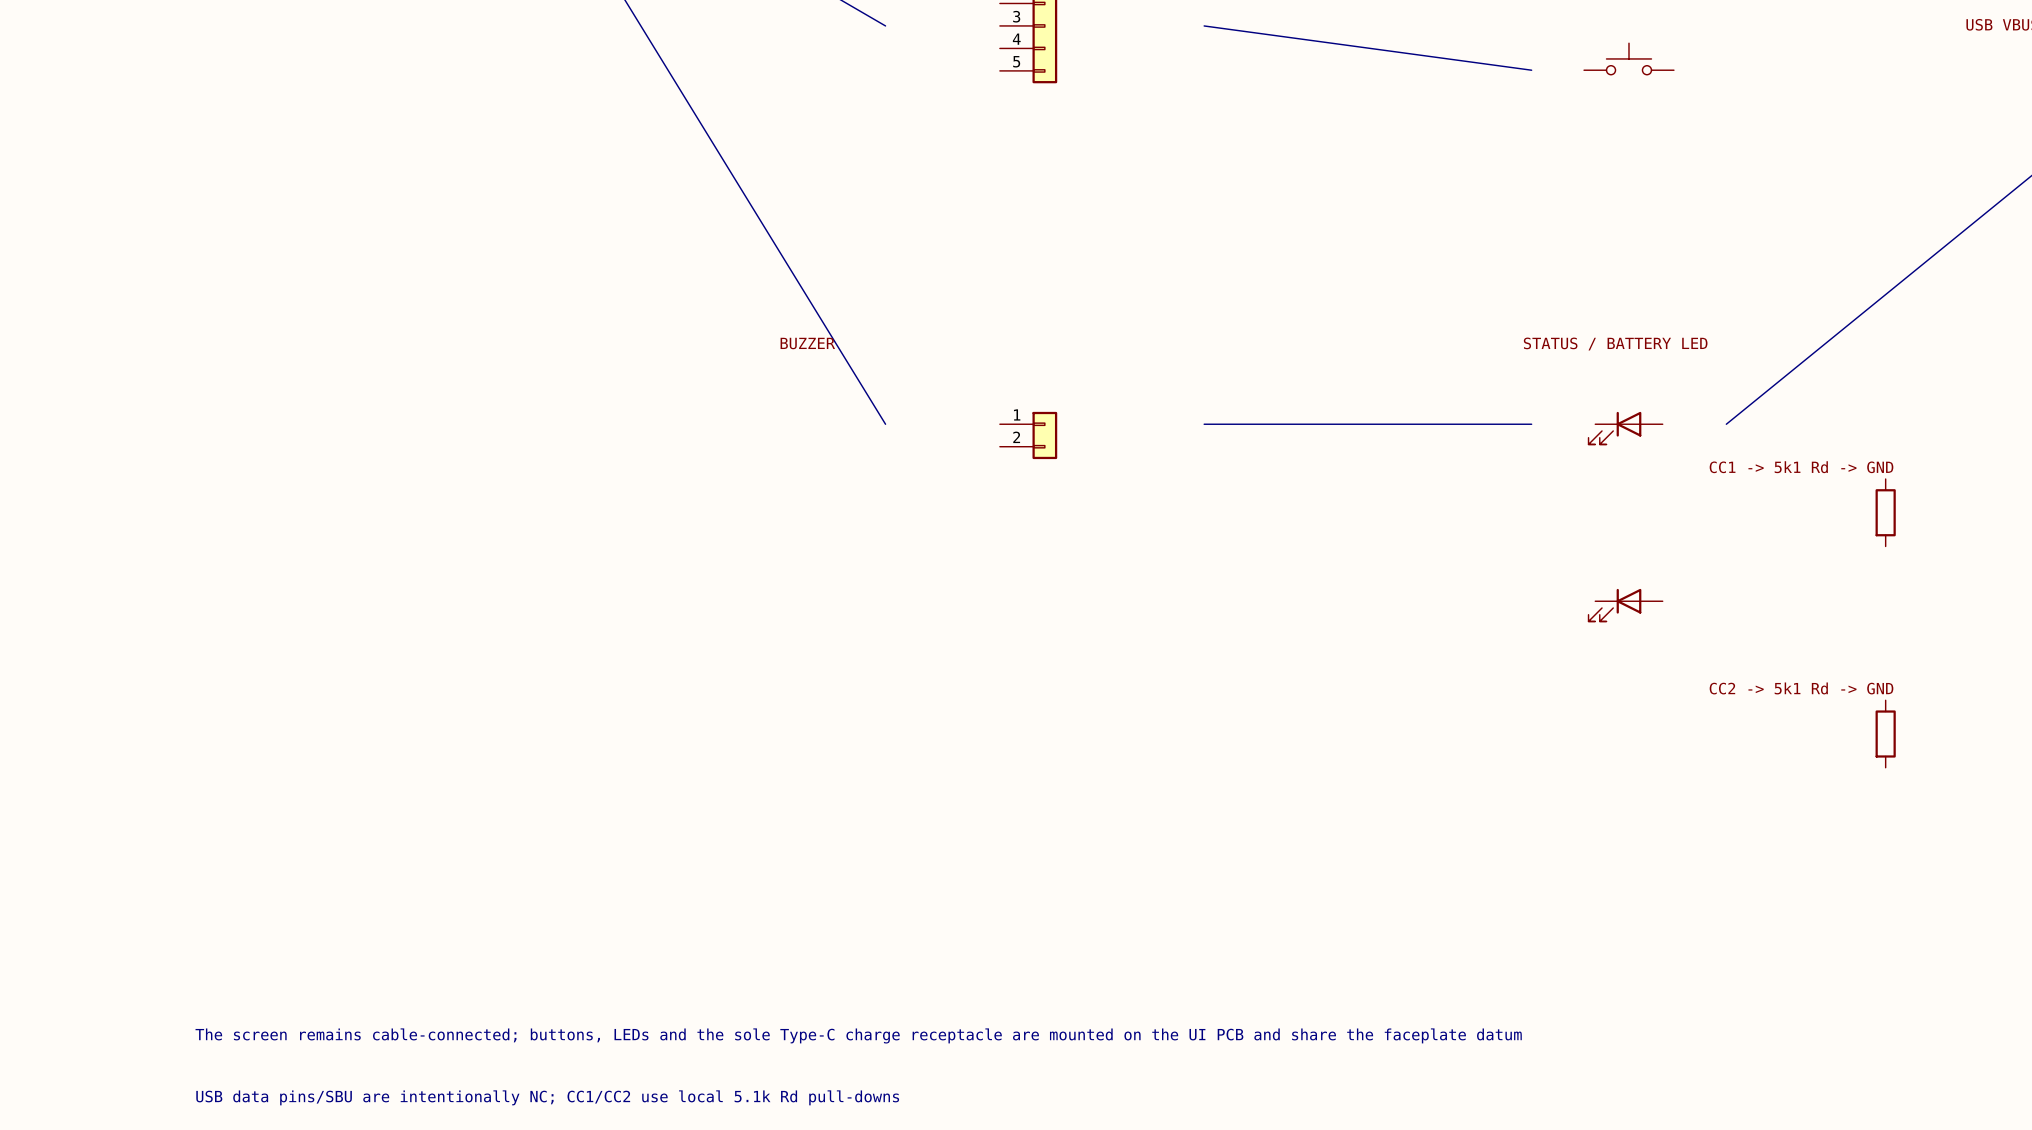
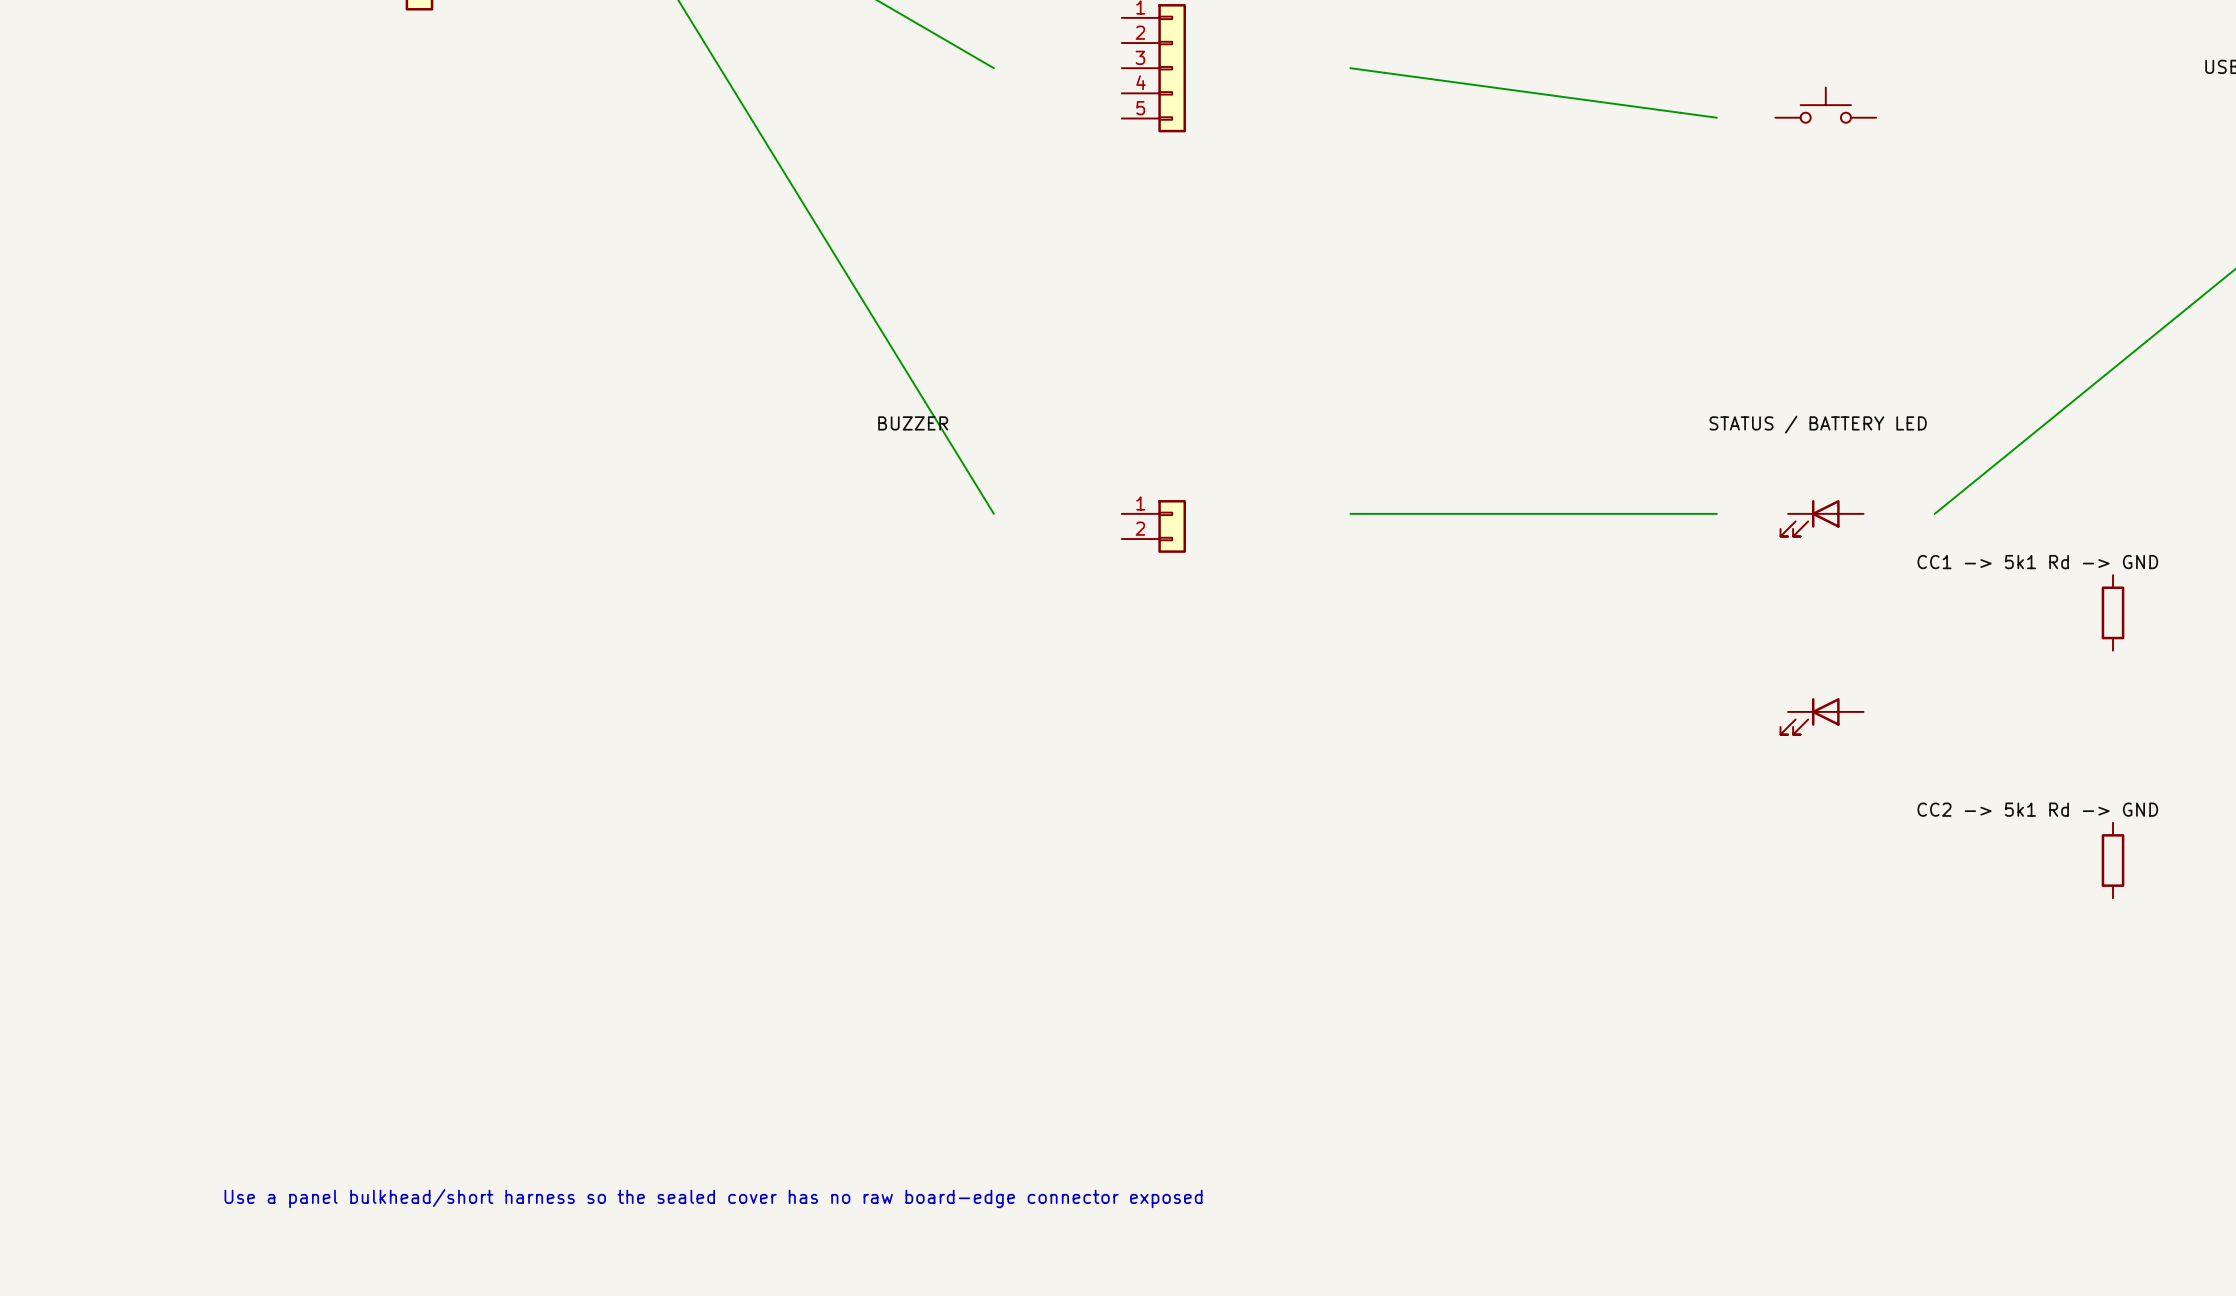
text: The screen remains cable-connected; buttons, LEDs and the sole Type-C charge receptacle are mounted on the UI PCB and share the faceplate datum (858, 1035) -> Use a panel bulkhead/short harness so the sealed cover has no raw board-edge connector exposed (713, 1198)
text: USB data pins/SBU are intentionally NC; CC1/CC2 use local 5.1k Rd pull-downs (547, 1097) -> none

